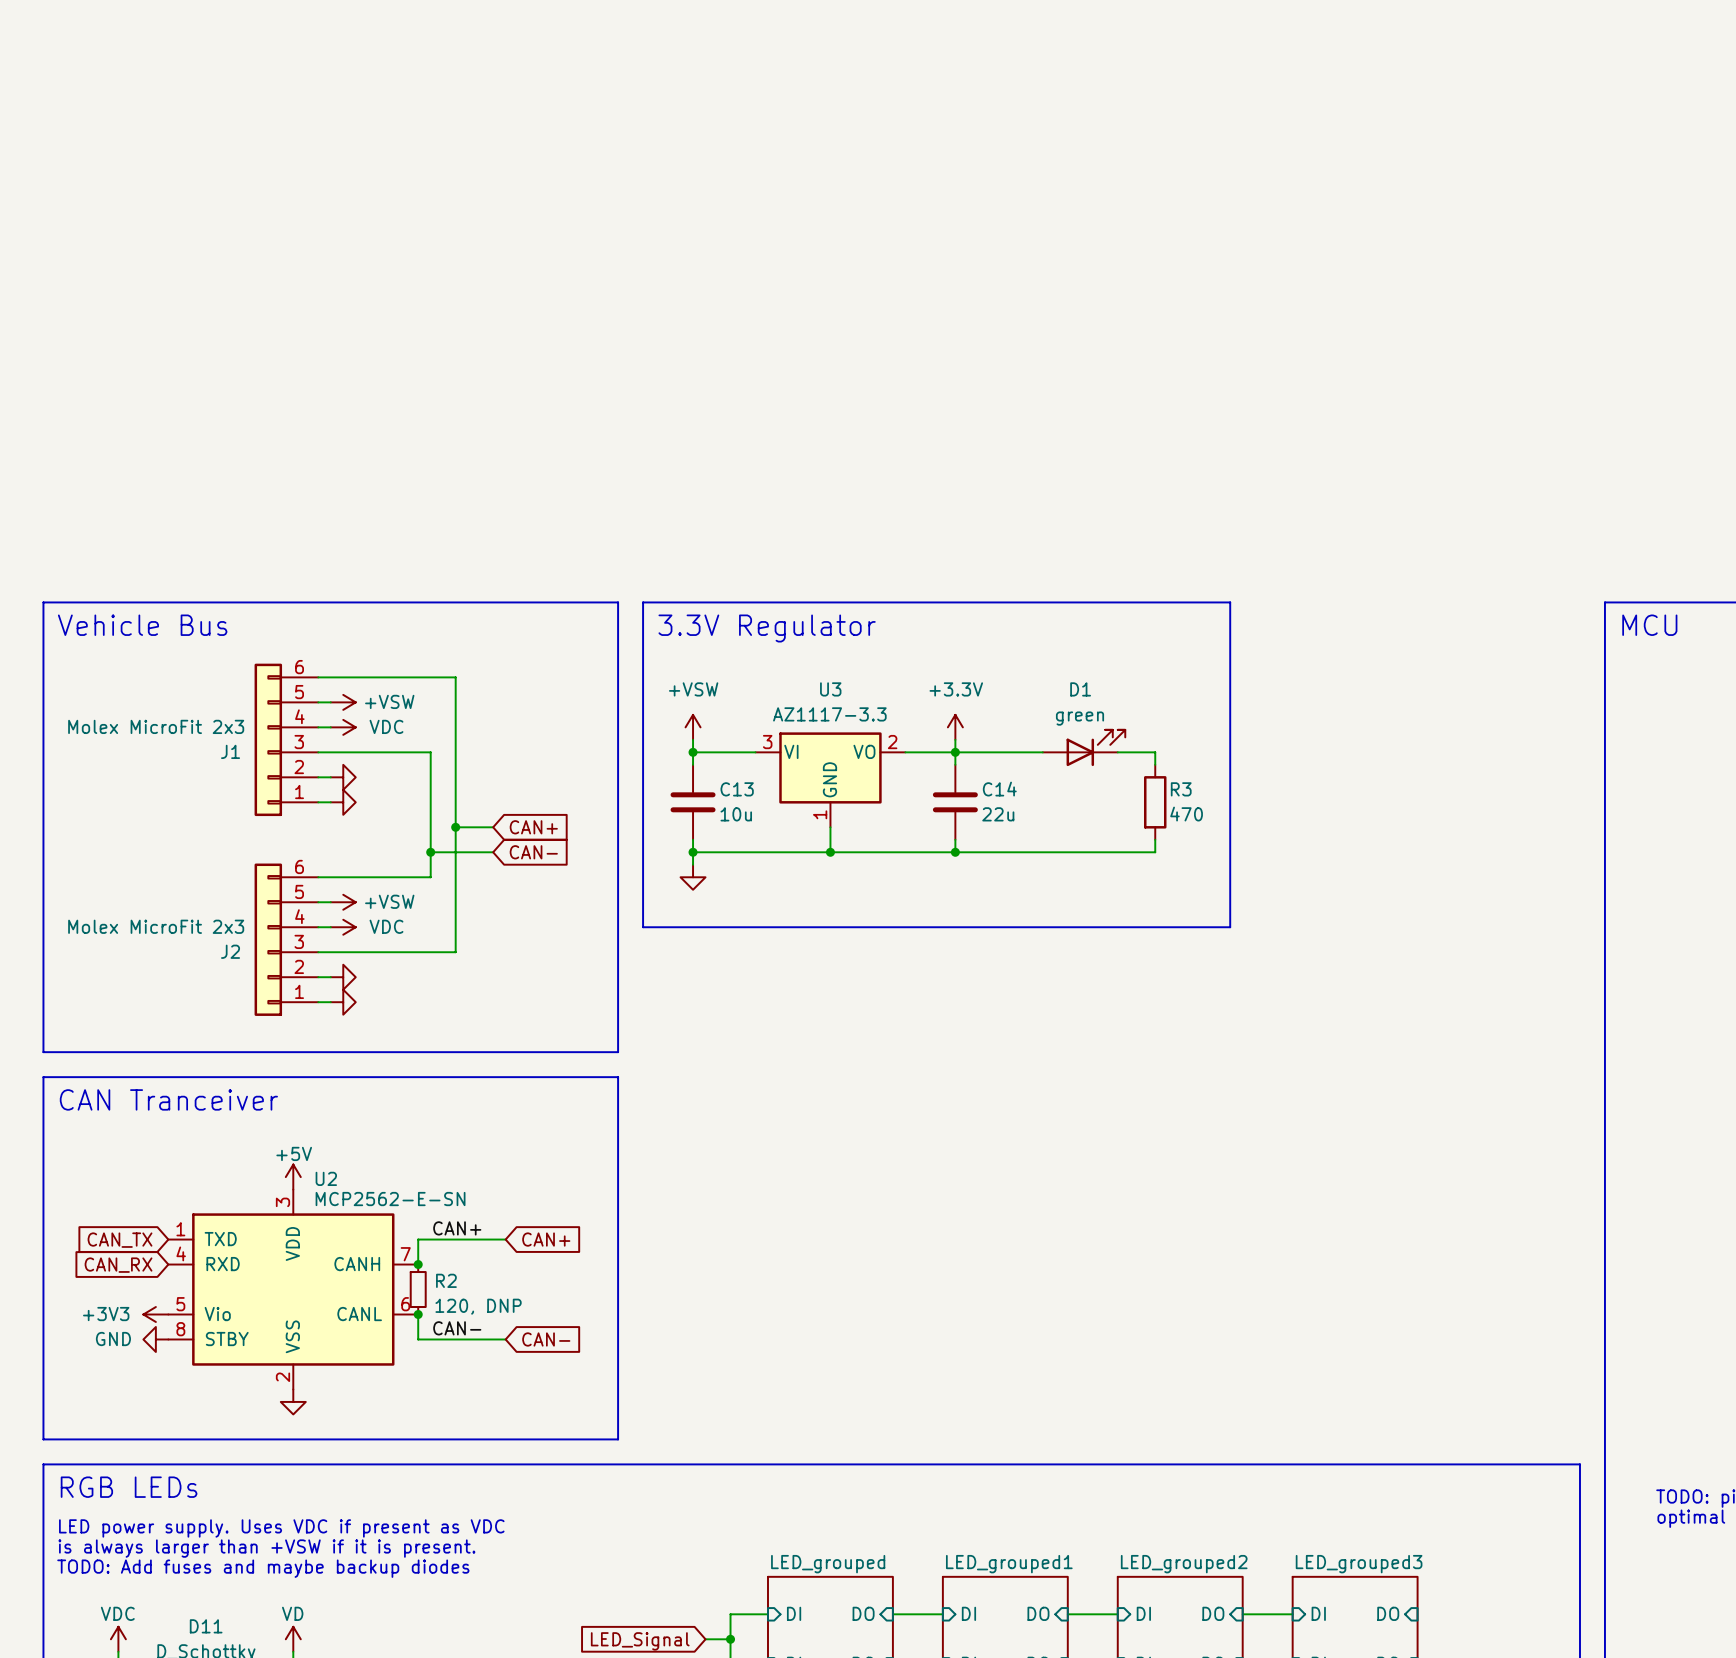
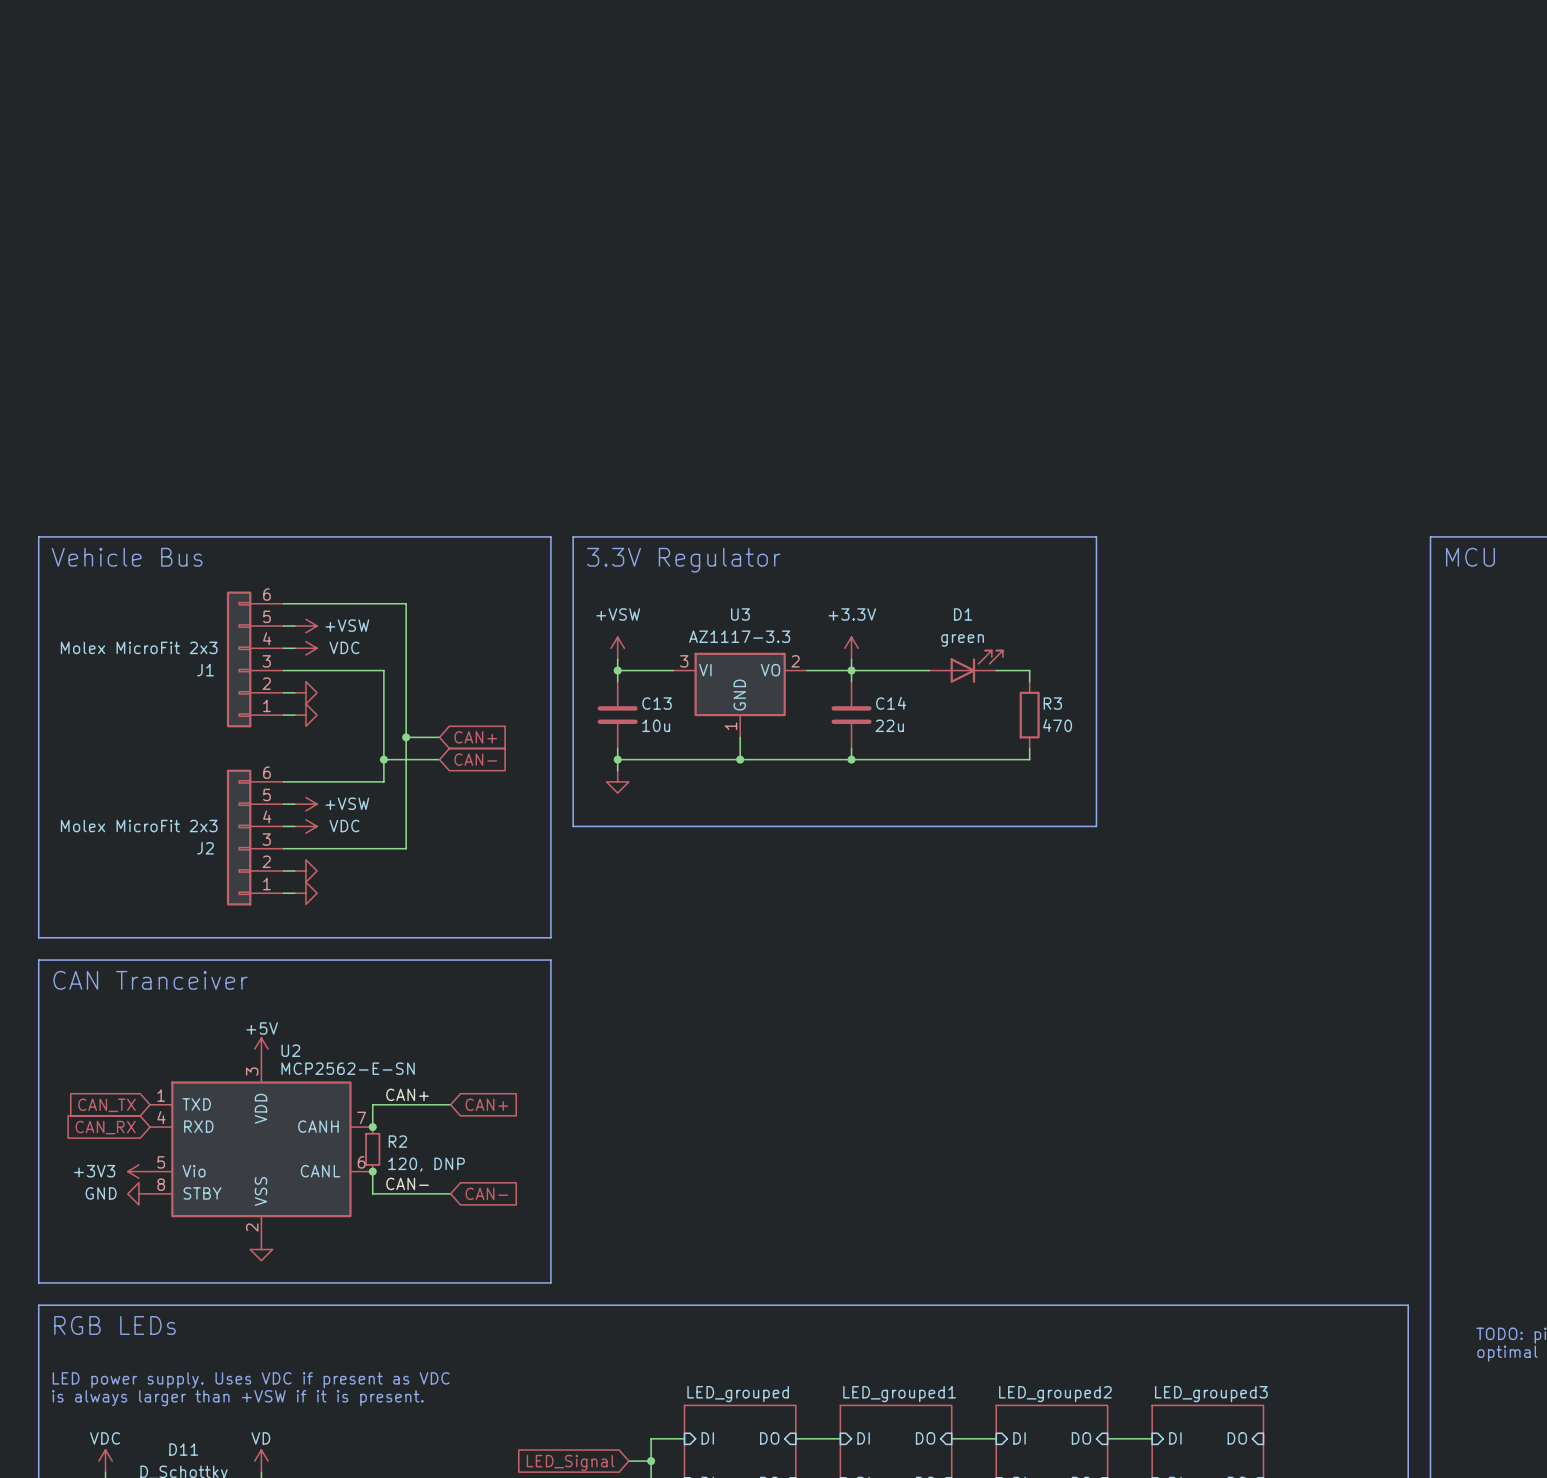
text: LED power supply. Uses VDC if present as VDC (281, 1528) -> none
text: is always larger than +VSW if it is present. (266, 1548) -> LED power supply. Uses VDC if present as VDC (251, 1380)
text: TODO: Add fuses and maybe backup diodes (263, 1568) -> is always larger than +VSW if it is present. (237, 1398)

